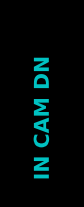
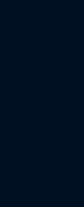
text: IN CAM DN (41, 118) -> none

